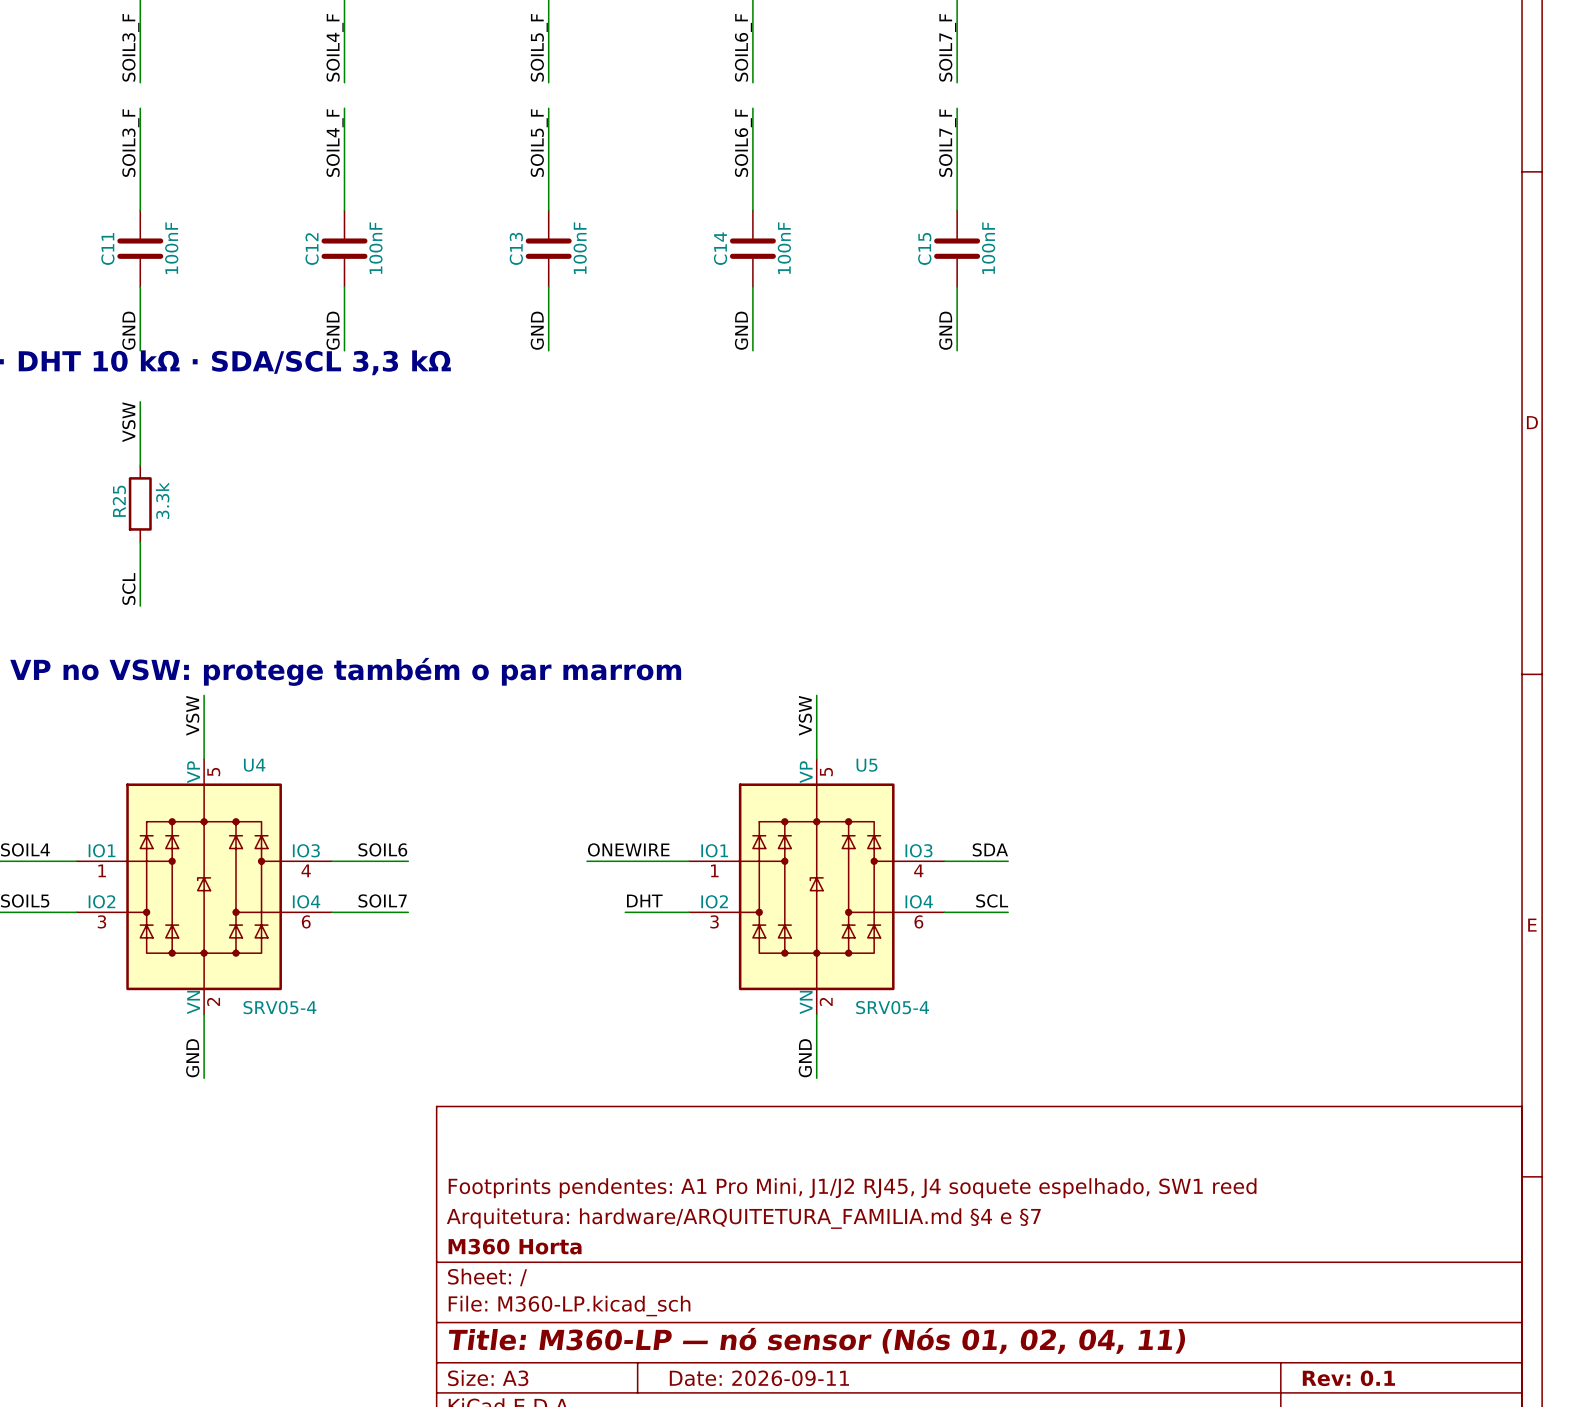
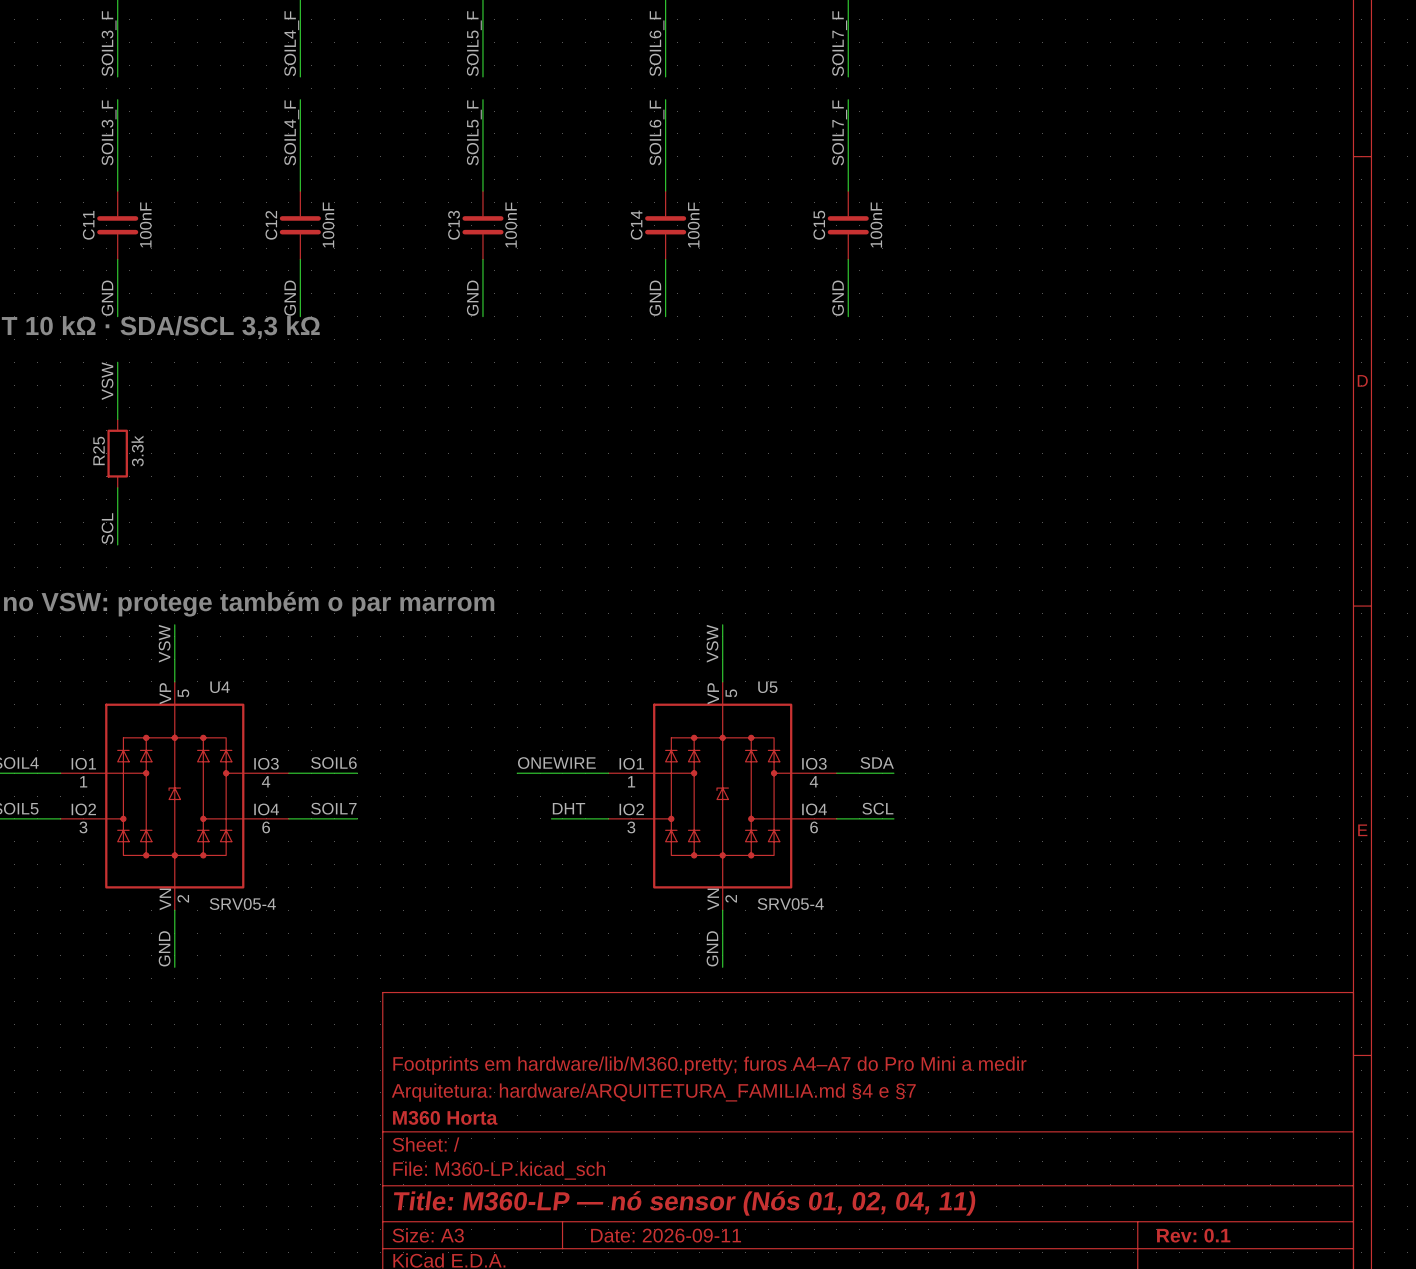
title block: Footprints pendentes: A1 Pro Mini, J1/J2 RJ45, J4 soquete espelhado, SW1 reed (852, 1188) -> Footprints em hardware/lib/M360.pretty; furos A4–A7 do Pro Mini a medir (709, 1065)

